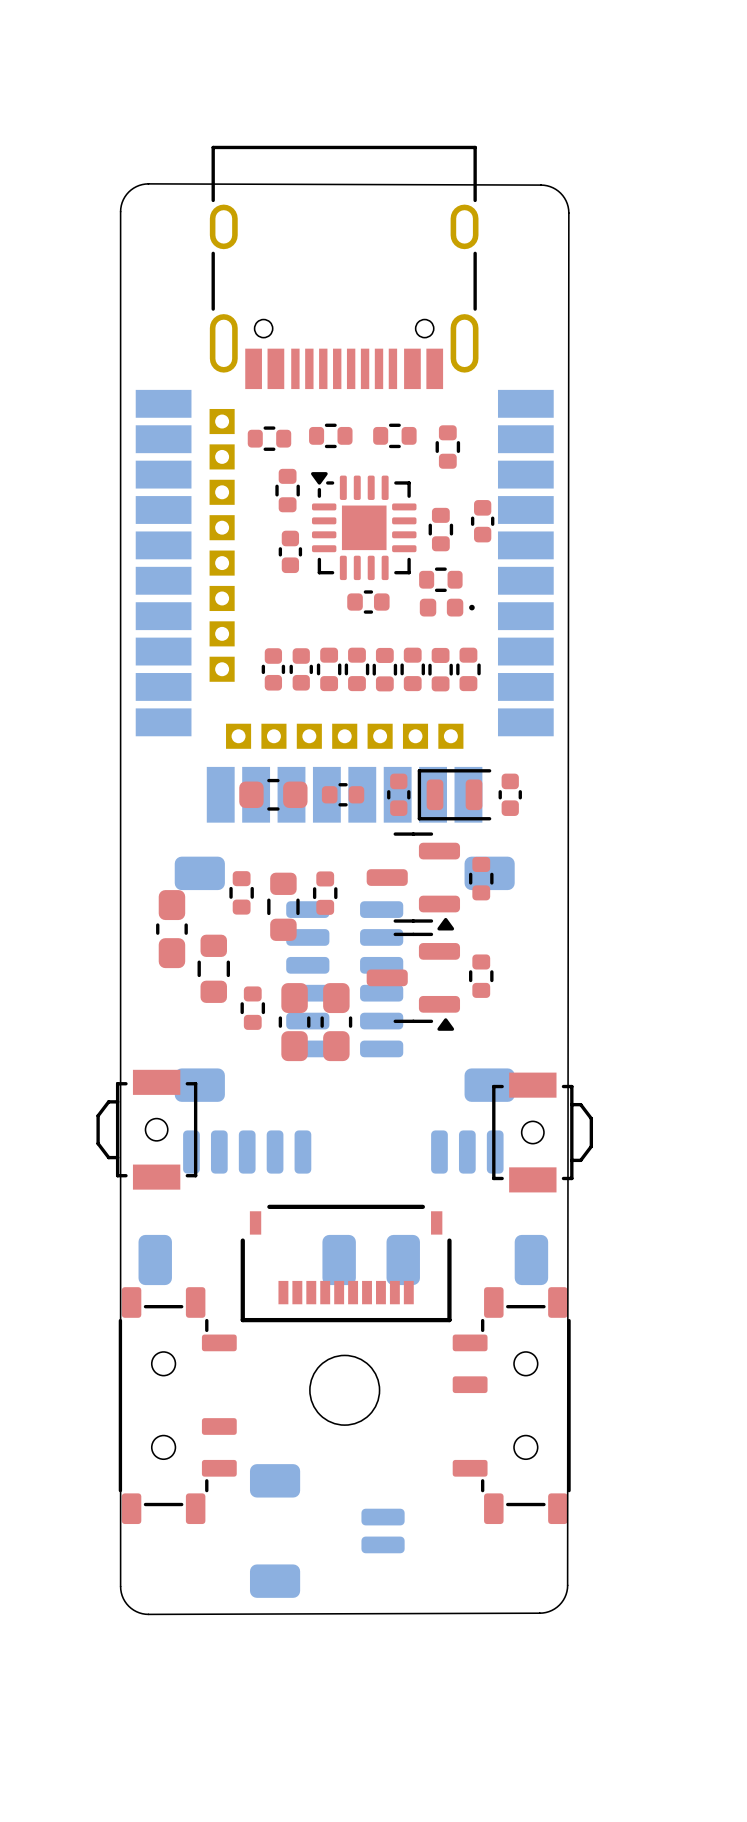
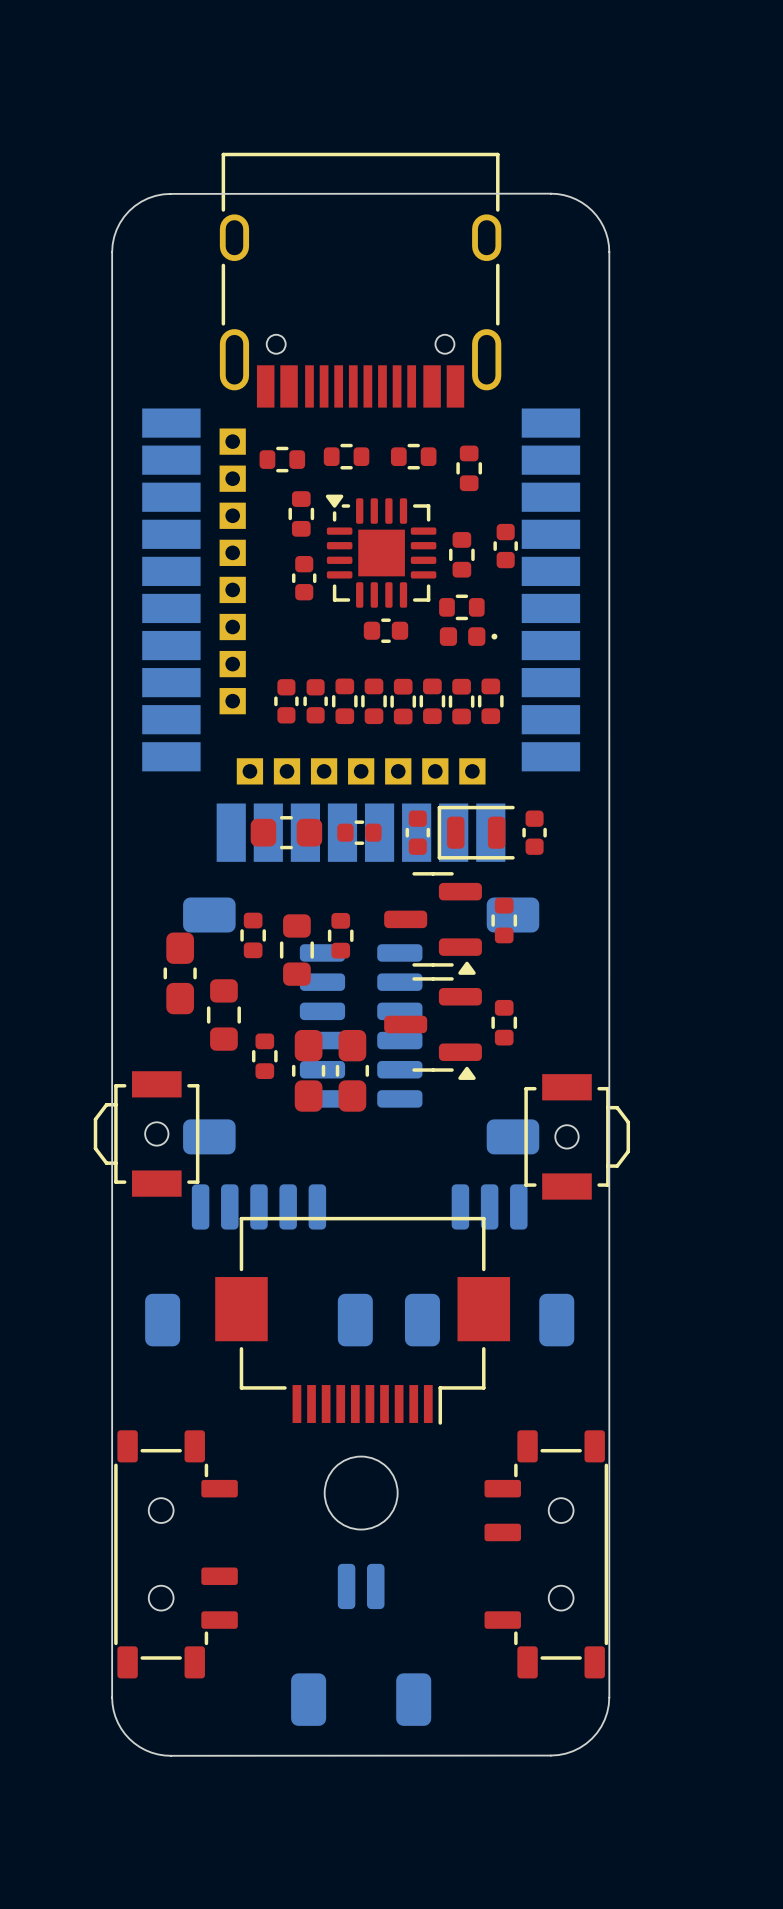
board edge: (148, 183) (540, 185) (550, 186) (558, 191) (564, 198) (568, 206) (567, 1585) (566, 1594) (561, 1602) (554, 1608) (545, 1612) (148, 1614) (139, 1612) (131, 1608) (124, 1601) (121, 1592) (120, 211) (122, 202) (128, 192) (136, 186) (142, 184) (145, 184) (148, 183) -> none
board edge: none -> (609, 251) (609, 1697) (607, 1712) (601, 1726) (586, 1743) (573, 1751) (558, 1755) (170, 1755) (145, 1750) (129, 1738) (117, 1722) (112, 1697)
board edge: none -> (609, 252) (606, 232) (592, 210) (570, 196) (550, 193) (162, 194) (148, 198) (134, 205) (124, 216) (116, 229) (112, 252) (112, 1697)
part position: (146, 1129) -> (146, 1133)
part position: (542, 1132) -> (577, 1136)
part footprint: [240, 1204, 452, 1323] -> [215, 1216, 511, 1425]
round board edge position: (344, 1390) -> (361, 1493)
part position: (177, 1405) -> (176, 1554)
part position: (511, 1405) -> (546, 1554)
part rotation: 0° (327, 1530) -> 90° counterclockwise (361, 1644)

